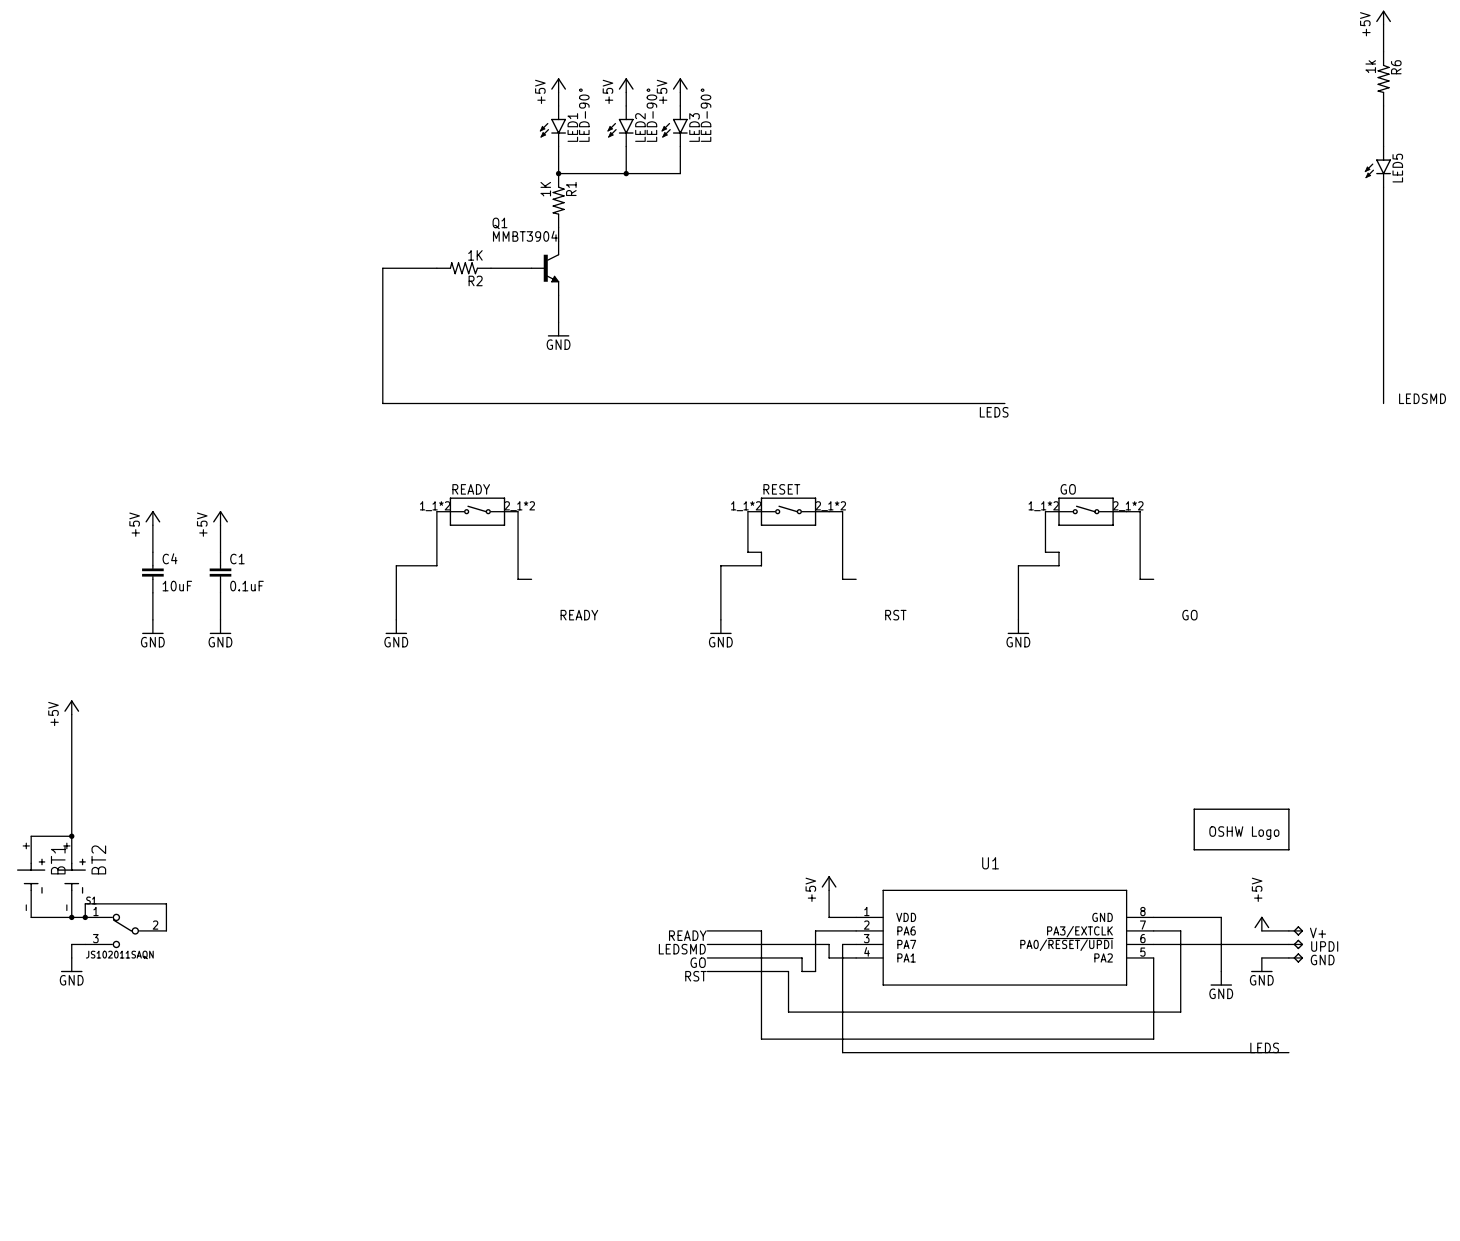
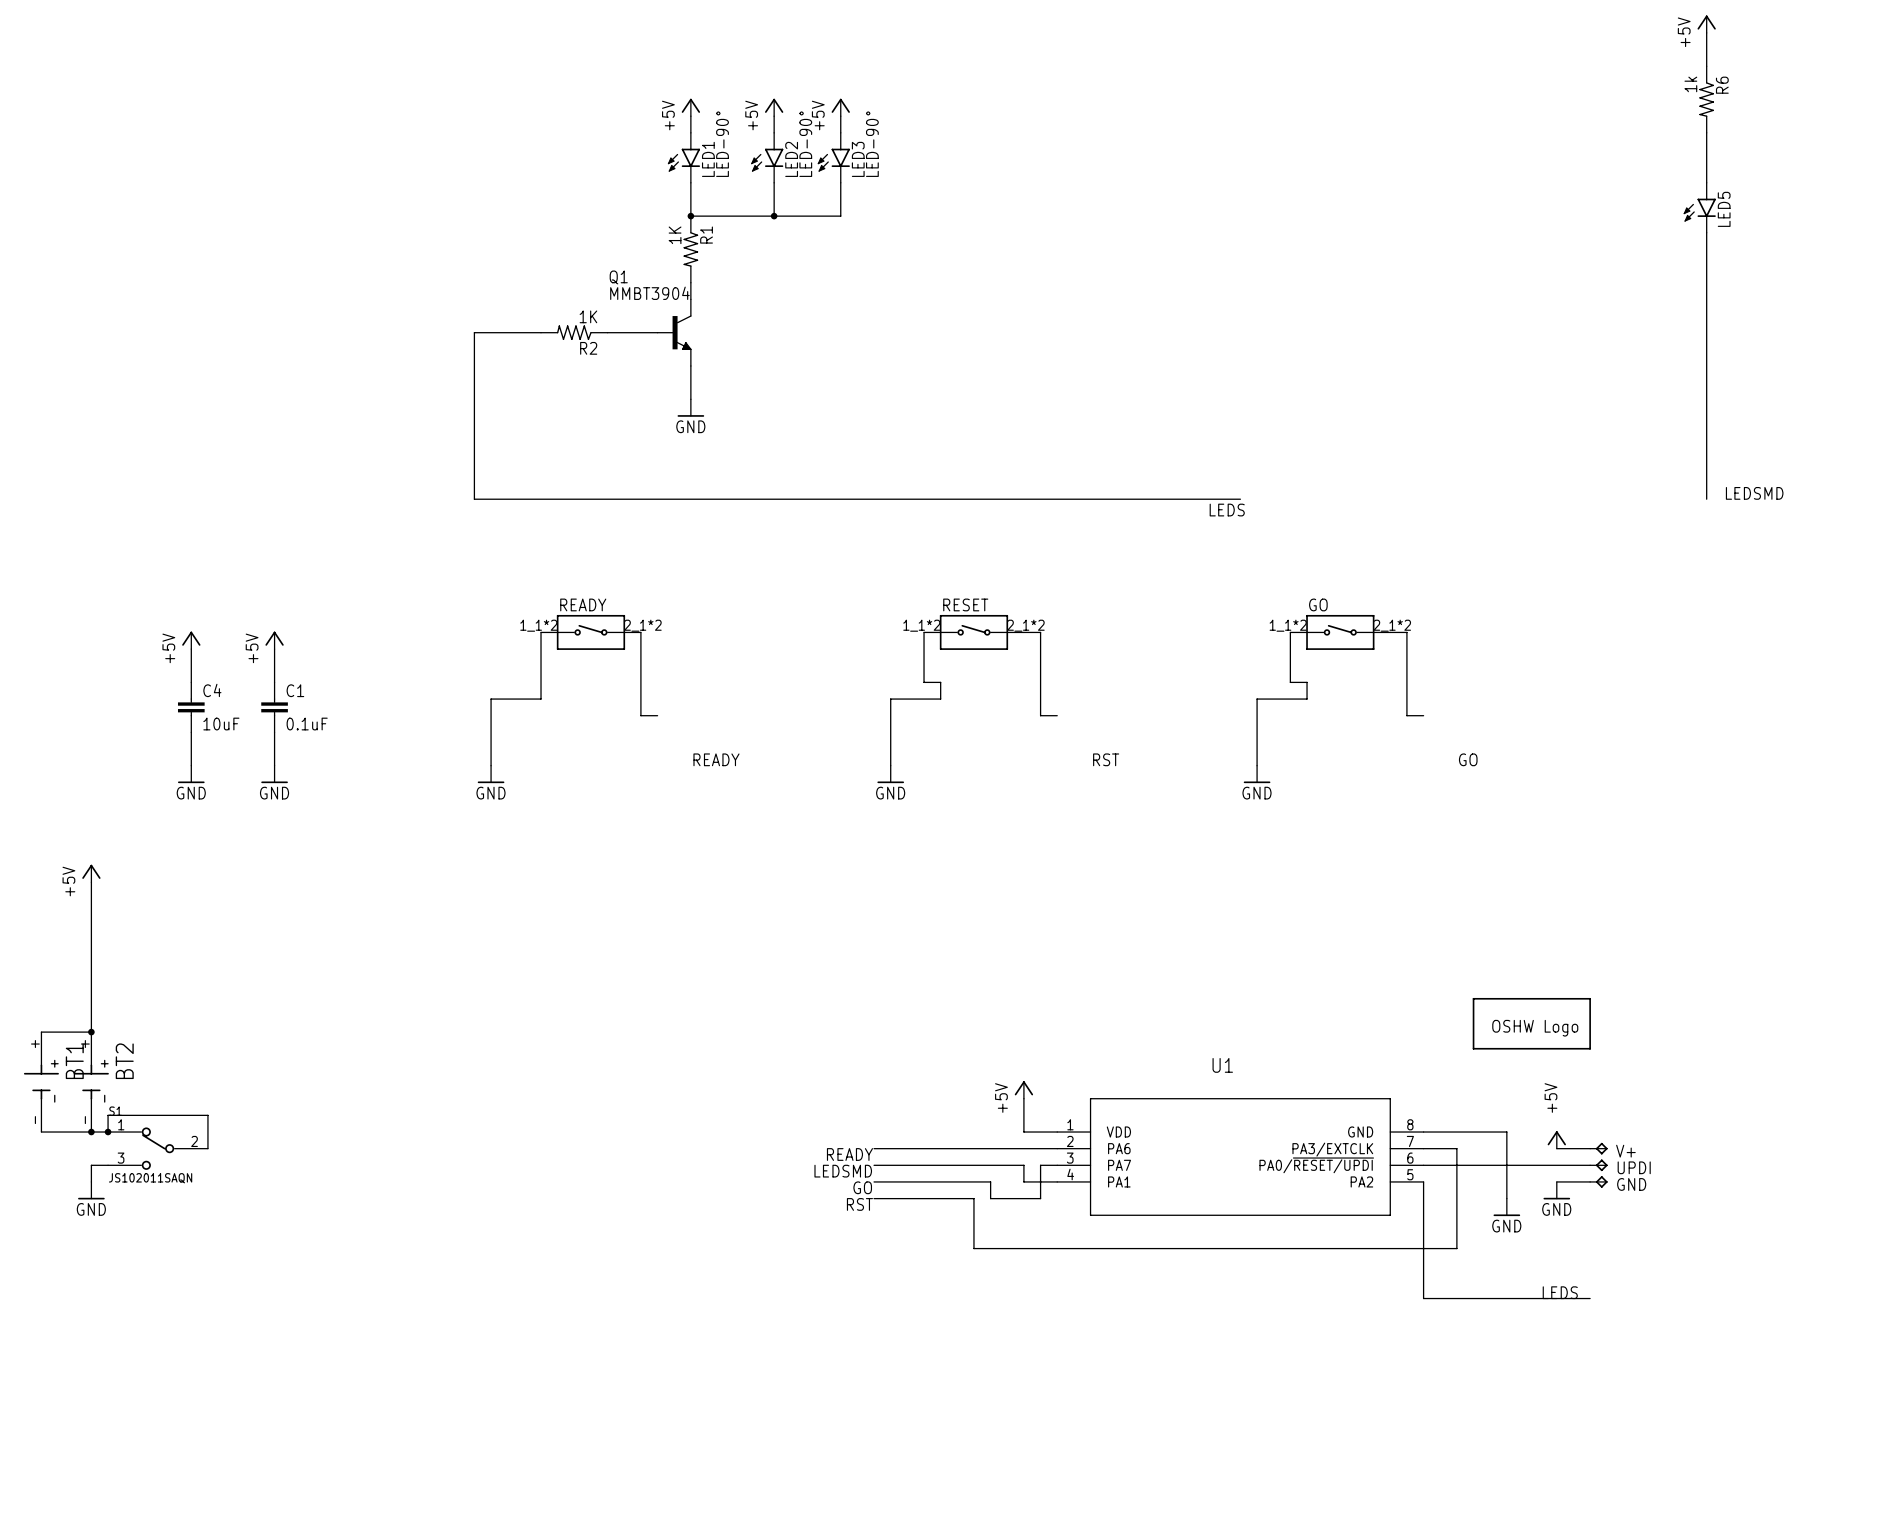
wire: (761, 930) (761, 1039) (1153, 1039) -> (940, 1148) (1007, 1148)
wire: (815, 930) (815, 971) -> (1040, 1198) (1007, 1198)
wire: (842, 971) (842, 1052) (1153, 1052) -> (1423, 1281) (1423, 1298)

